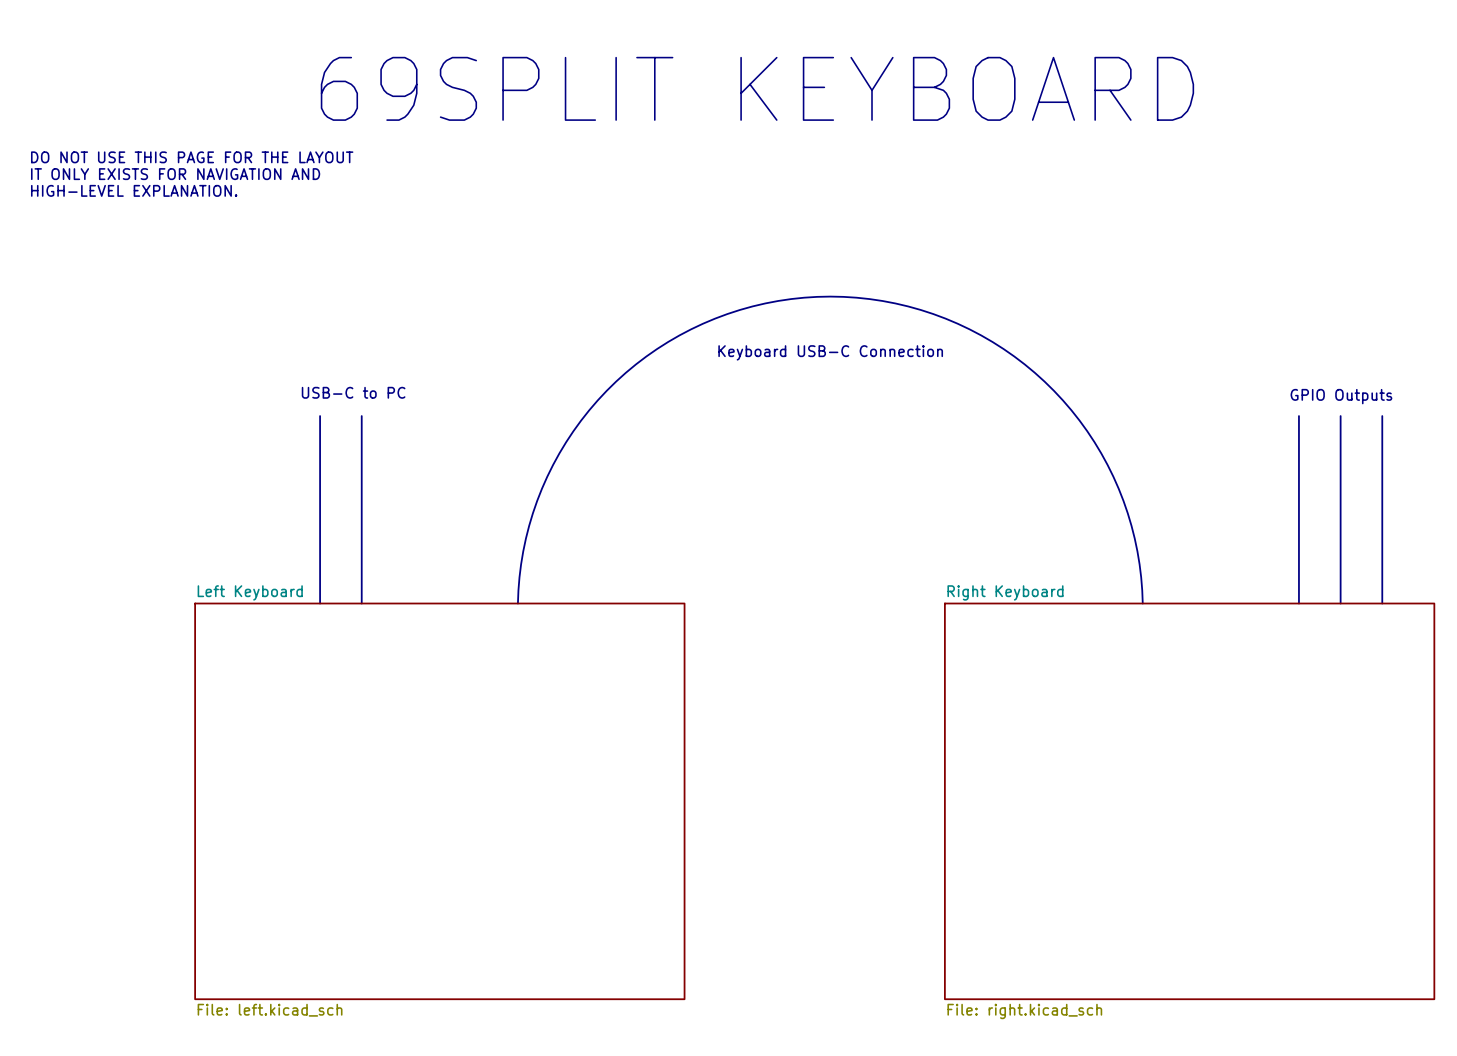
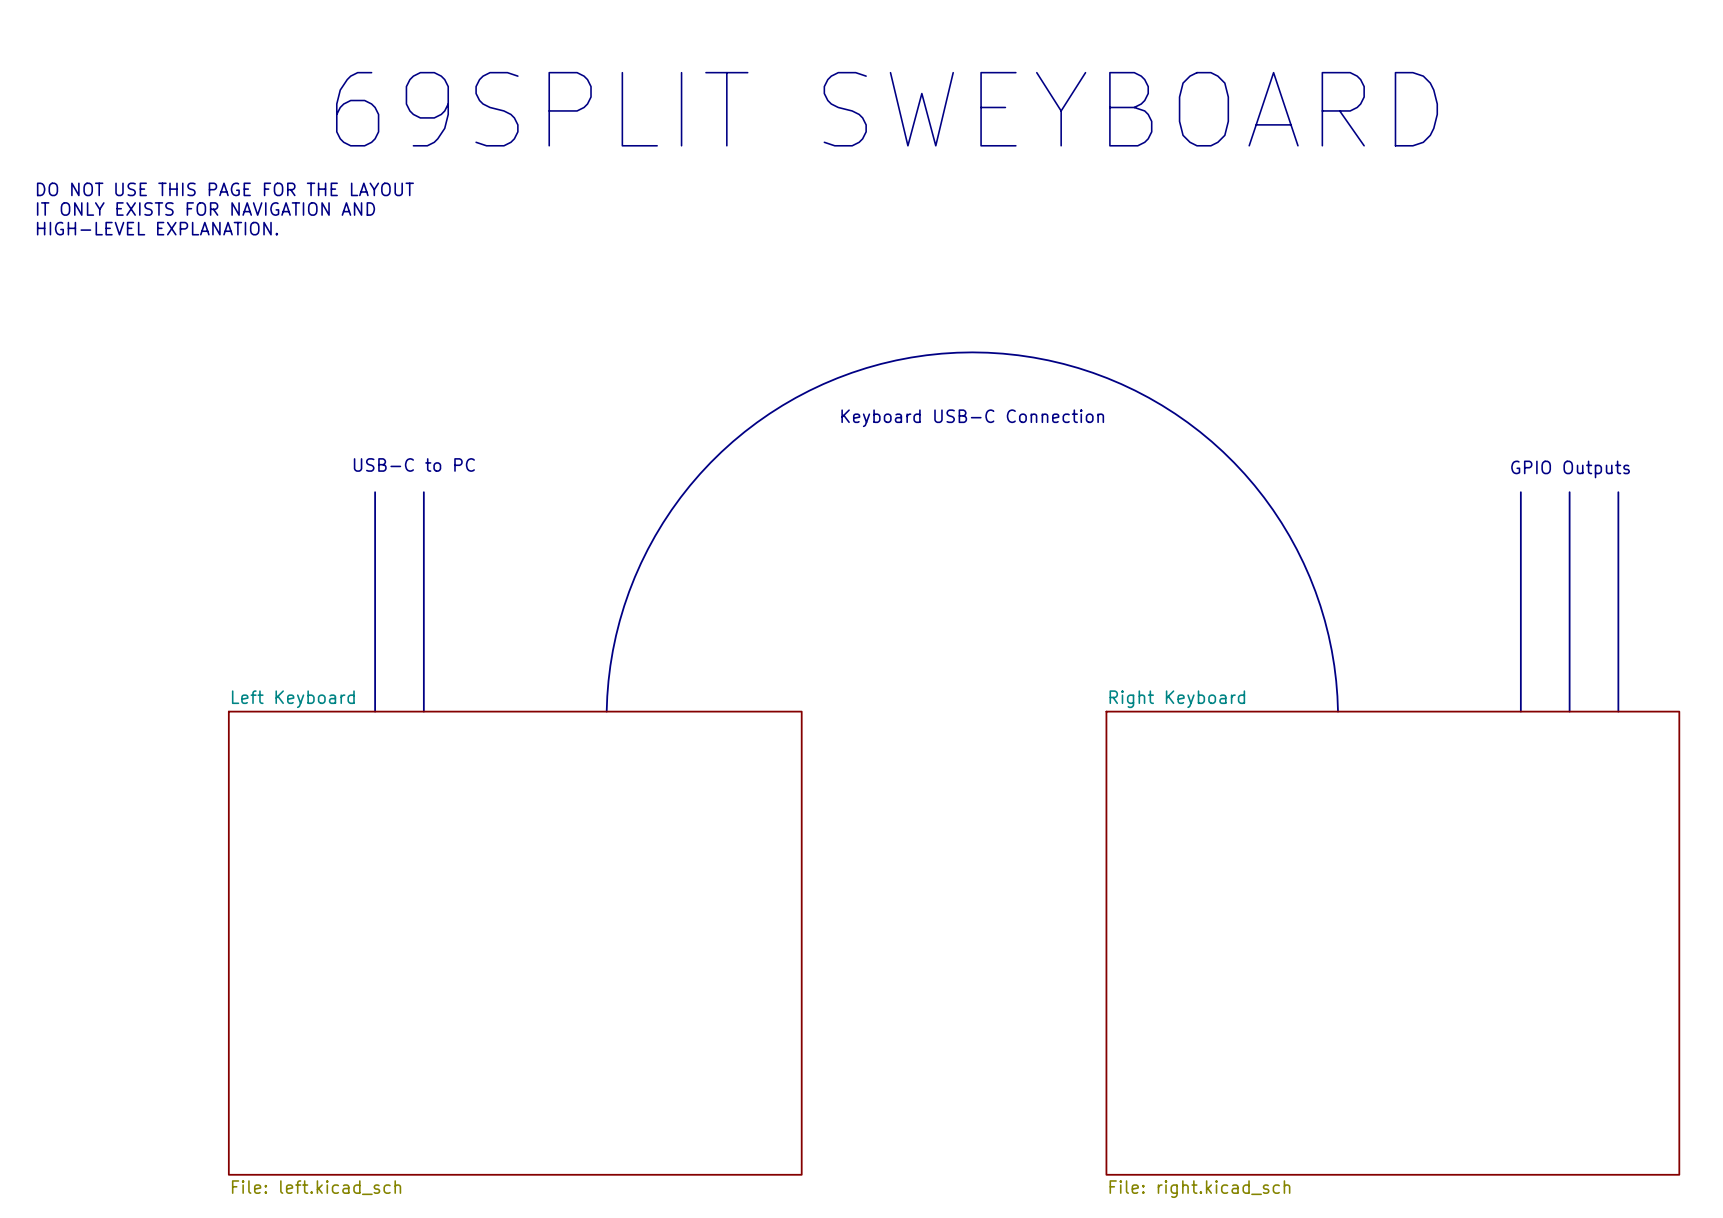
text: 69SPLIT KEYBOARD (757, 88) -> 69SPLIT SWEYBOARD (887, 109)

